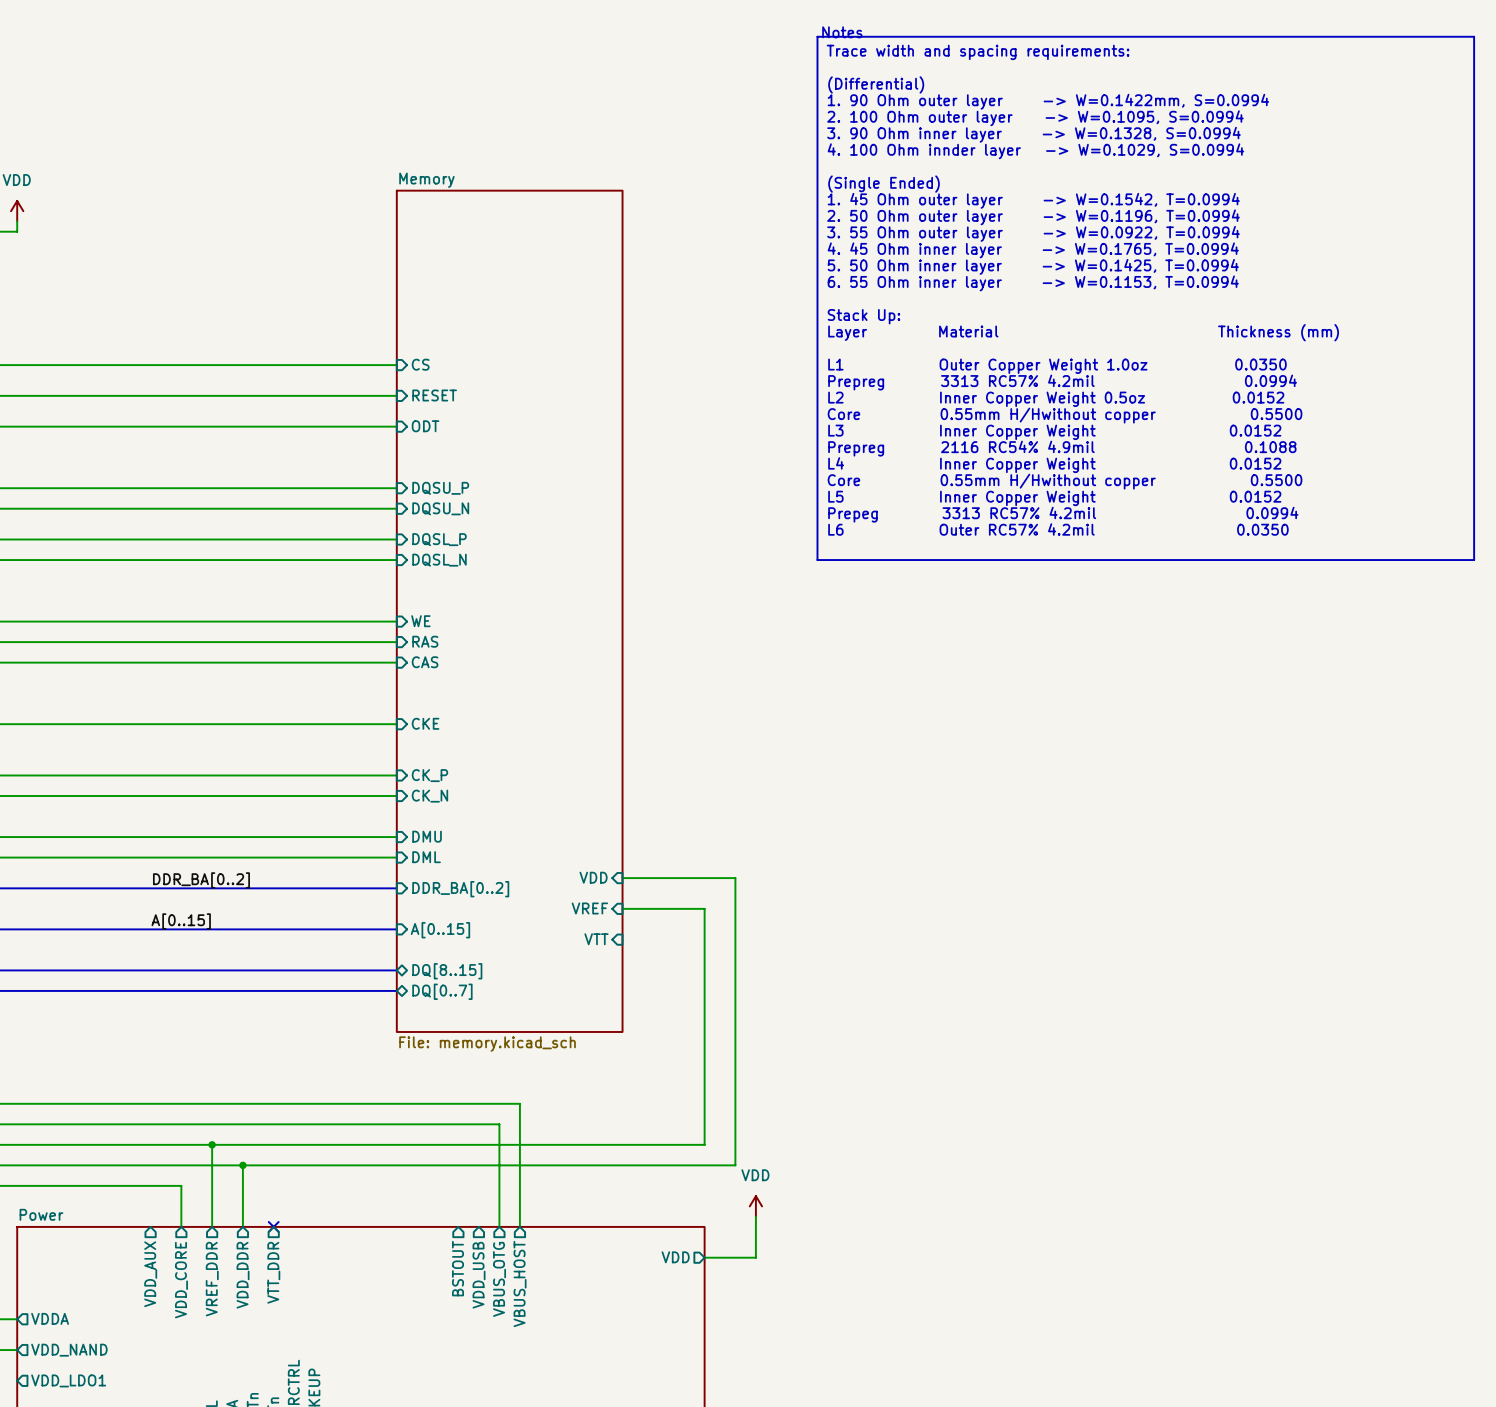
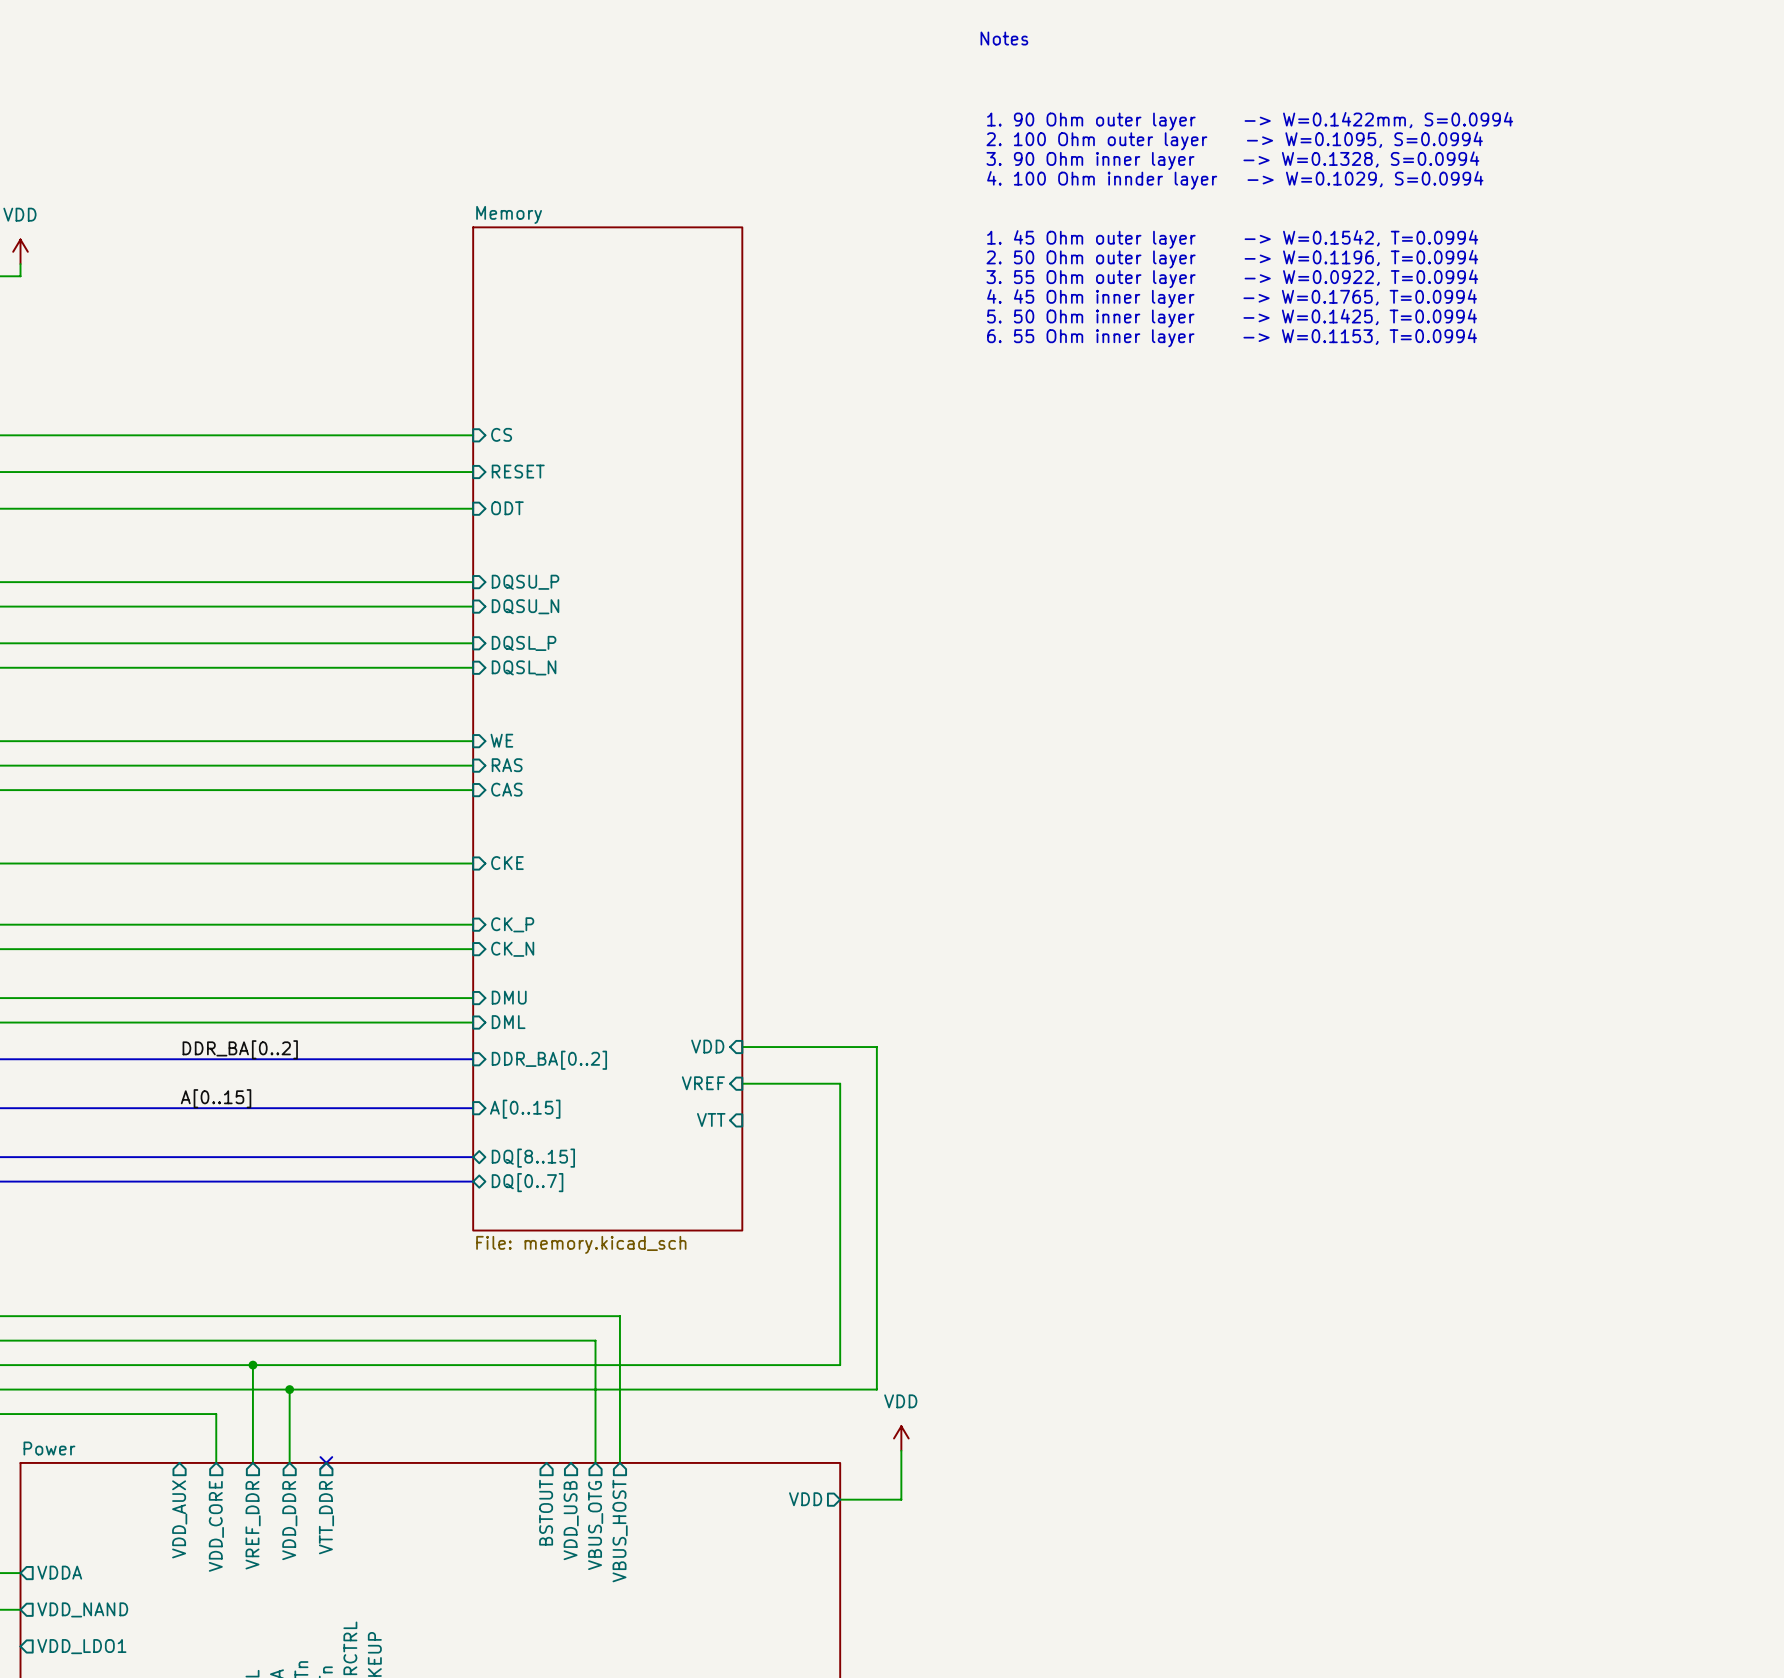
line: (817, 36) (1474, 36) (1474, 560) (817, 560) (817, 36) -> none
text: Trace width and spacing requirements: (978, 52) -> none
text: (Differential) (876, 84) -> none
text: (Single Ended) (884, 184) -> none
text: Stack Up: (863, 316) -> none
text: Layer Material Thickness (mm) (1083, 332) -> none
text: L1 Outer Copper Weight 1.0oz 0.0350 (1057, 366) -> none
text: Prepreg 3313 RC57% 4.2mil 0.0994 (1062, 382) -> none
text: L2 Inner Copper Weight 0.5oz 0.0152 (1056, 399) -> none
text: Core 0.55mm H/Hwithout copper 0.5500 (1065, 415) -> none
text: L3 Inner Copper Weight 0.0152 (1054, 432) -> none
text: Prepreg 2116 RC54% 4.9mil 0.1088 (1062, 448) -> none
text: L4 Inner Copper Weight 0.0152 (1054, 465) -> none
text: Core 0.55mm H/Hwithout copper 0.5500 (1065, 481) -> none
text: L5 Inner Copper Weight 0.0152 (1054, 498) -> none
text: Prepeg 3313 RC57% 4.2mil 0.0994 (1063, 514) -> none
text: L6 Outer RC57% 4.2mil 0.0350 (1058, 529) -> none

